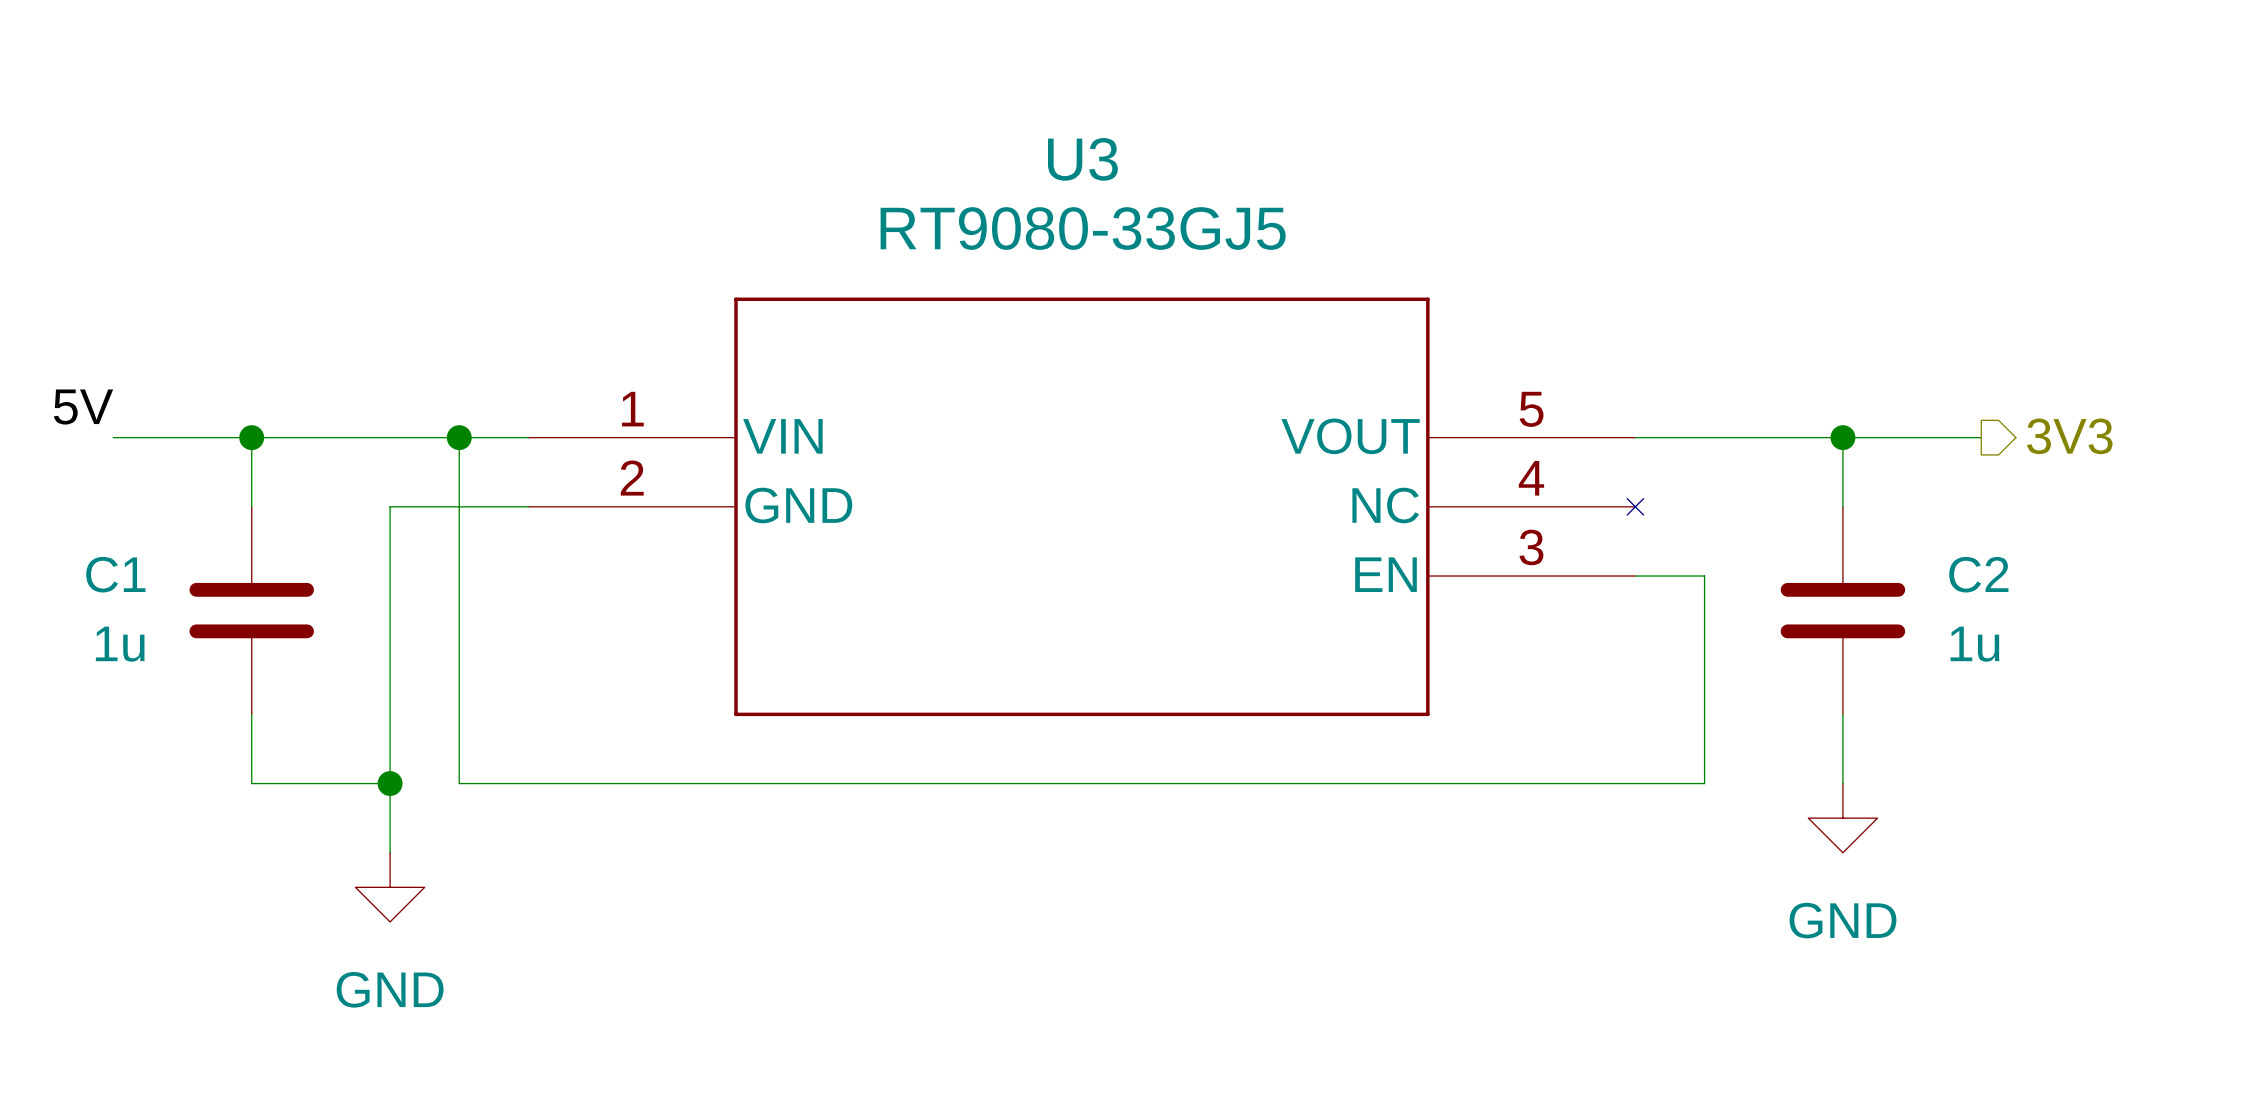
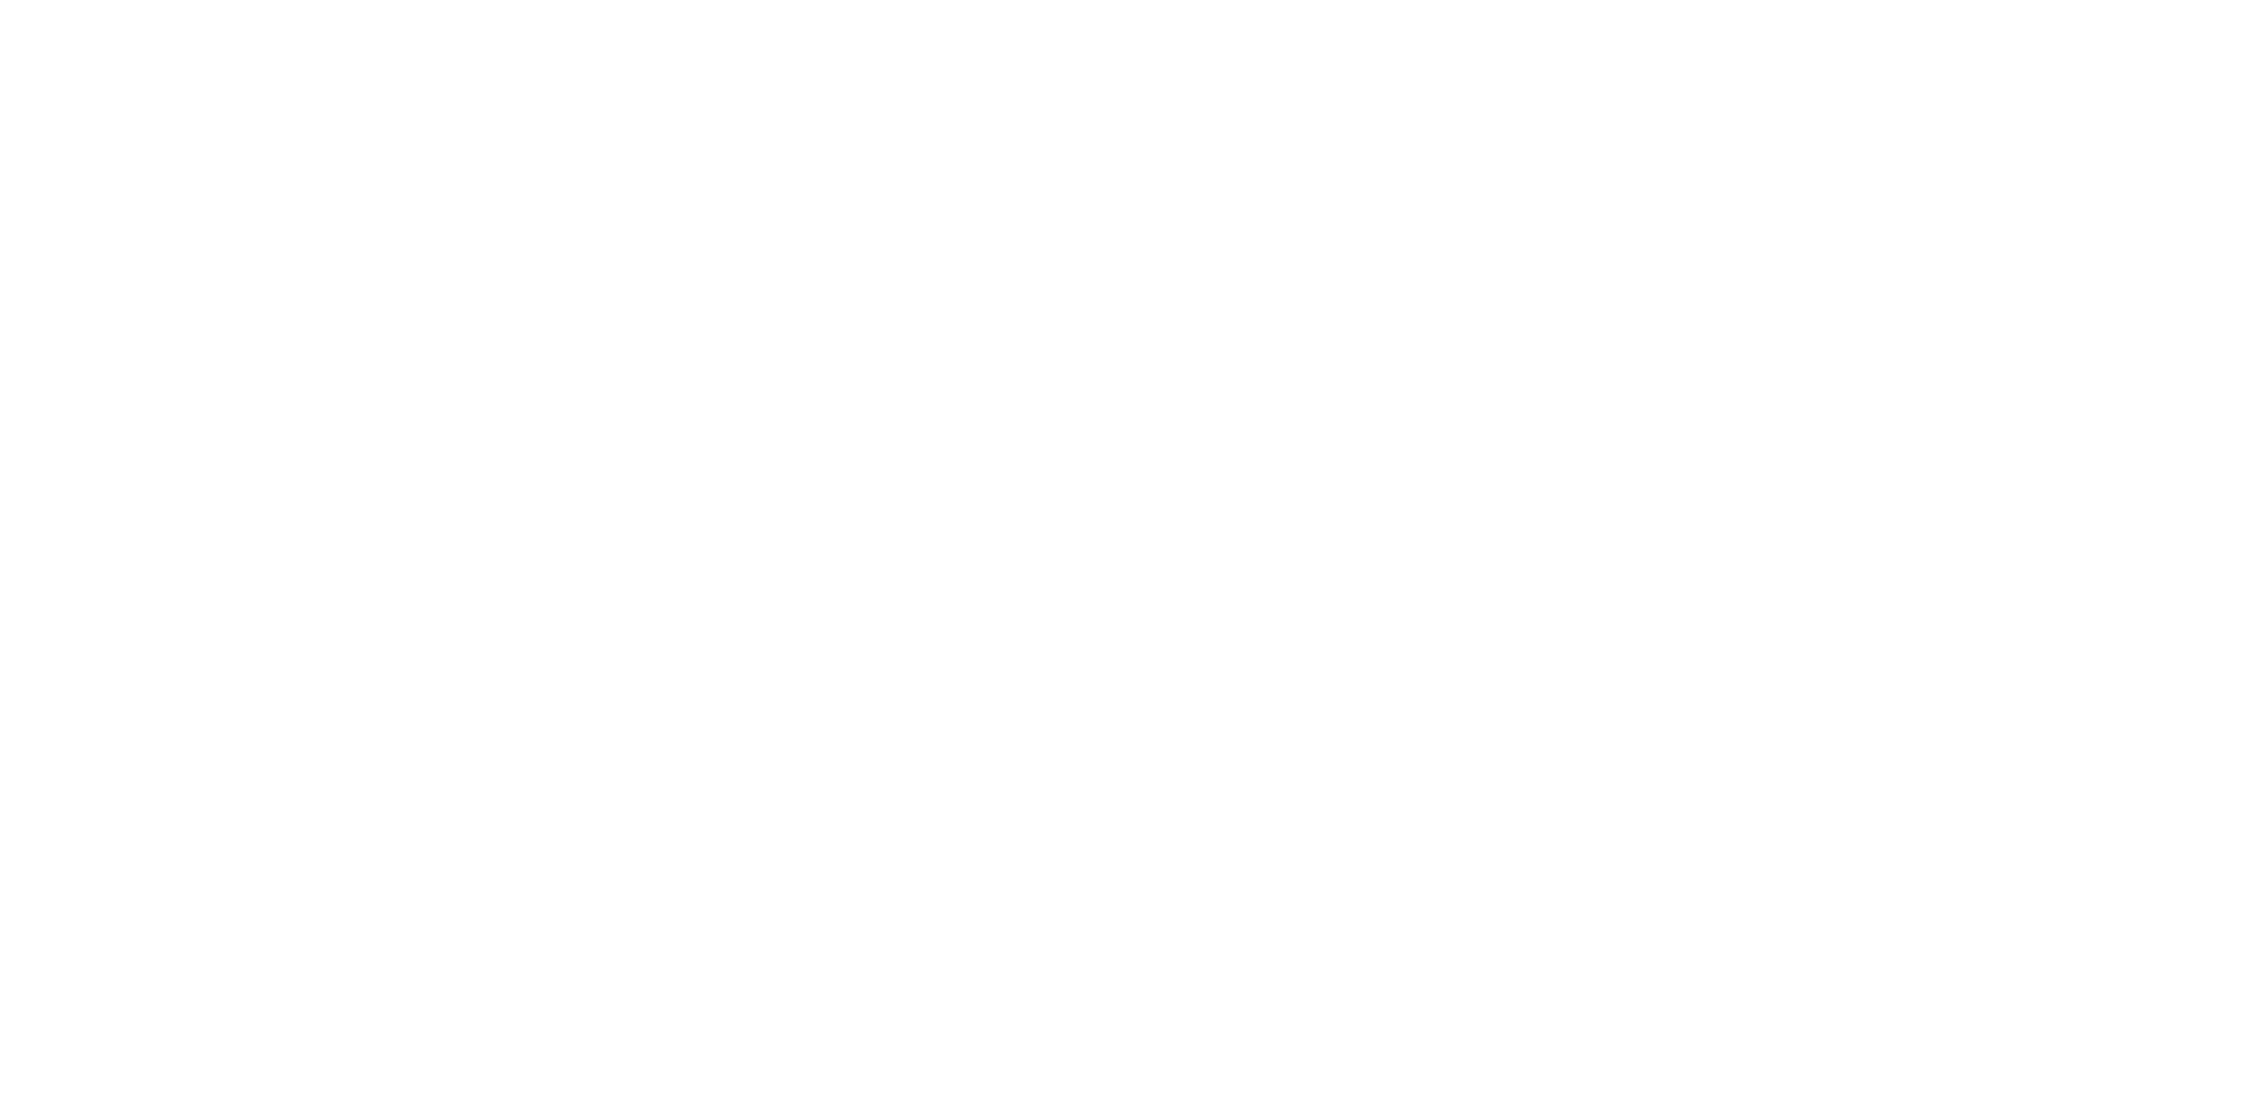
label: 5V (83, 407) -> none
hierarchical label: 3V3 (2069, 436) -> none
wire: (113, 437) (528, 437) -> none
wire: (251, 437) (251, 506) -> none
junction: (251, 437) -> none
wire: (459, 437) (459, 783) (1704, 783) (1704, 576) (1635, 576) -> none
junction: (459, 437) -> none
wire: (1635, 437) (1981, 437) -> none
wire: (1842, 437) (1842, 506) -> none
junction: (1842, 437) -> none
wire: (528, 506) (390, 506) (390, 852) -> none
U3: RT9080-33GJ5 (1086, 506) -> none
C1: 1u (251, 610) -> none
C2: 1u (1842, 610) -> none
wire: (251, 714) (251, 783) (390, 783) -> none
wire: (1842, 714) (1842, 783) -> none
junction: (390, 783) -> none
power symbol: GND (1842, 818) -> none
power symbol: GND (390, 887) -> none

